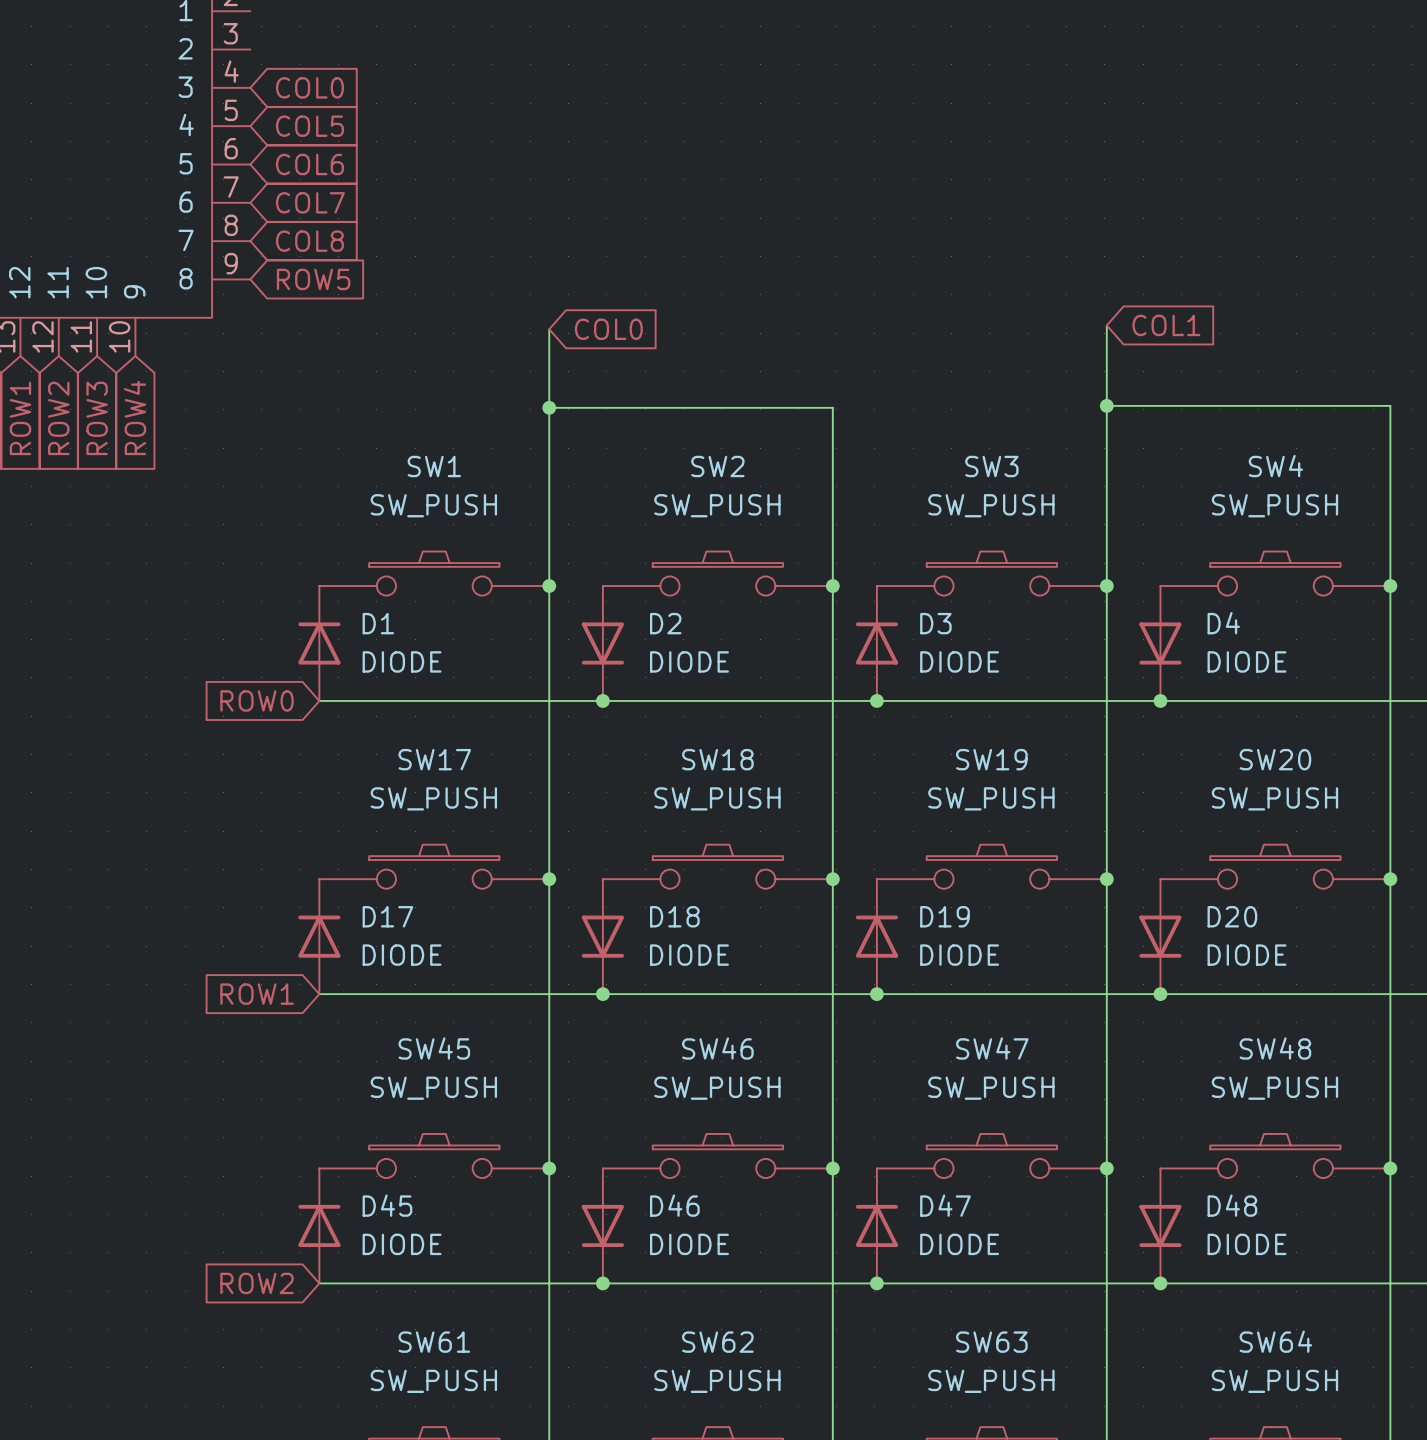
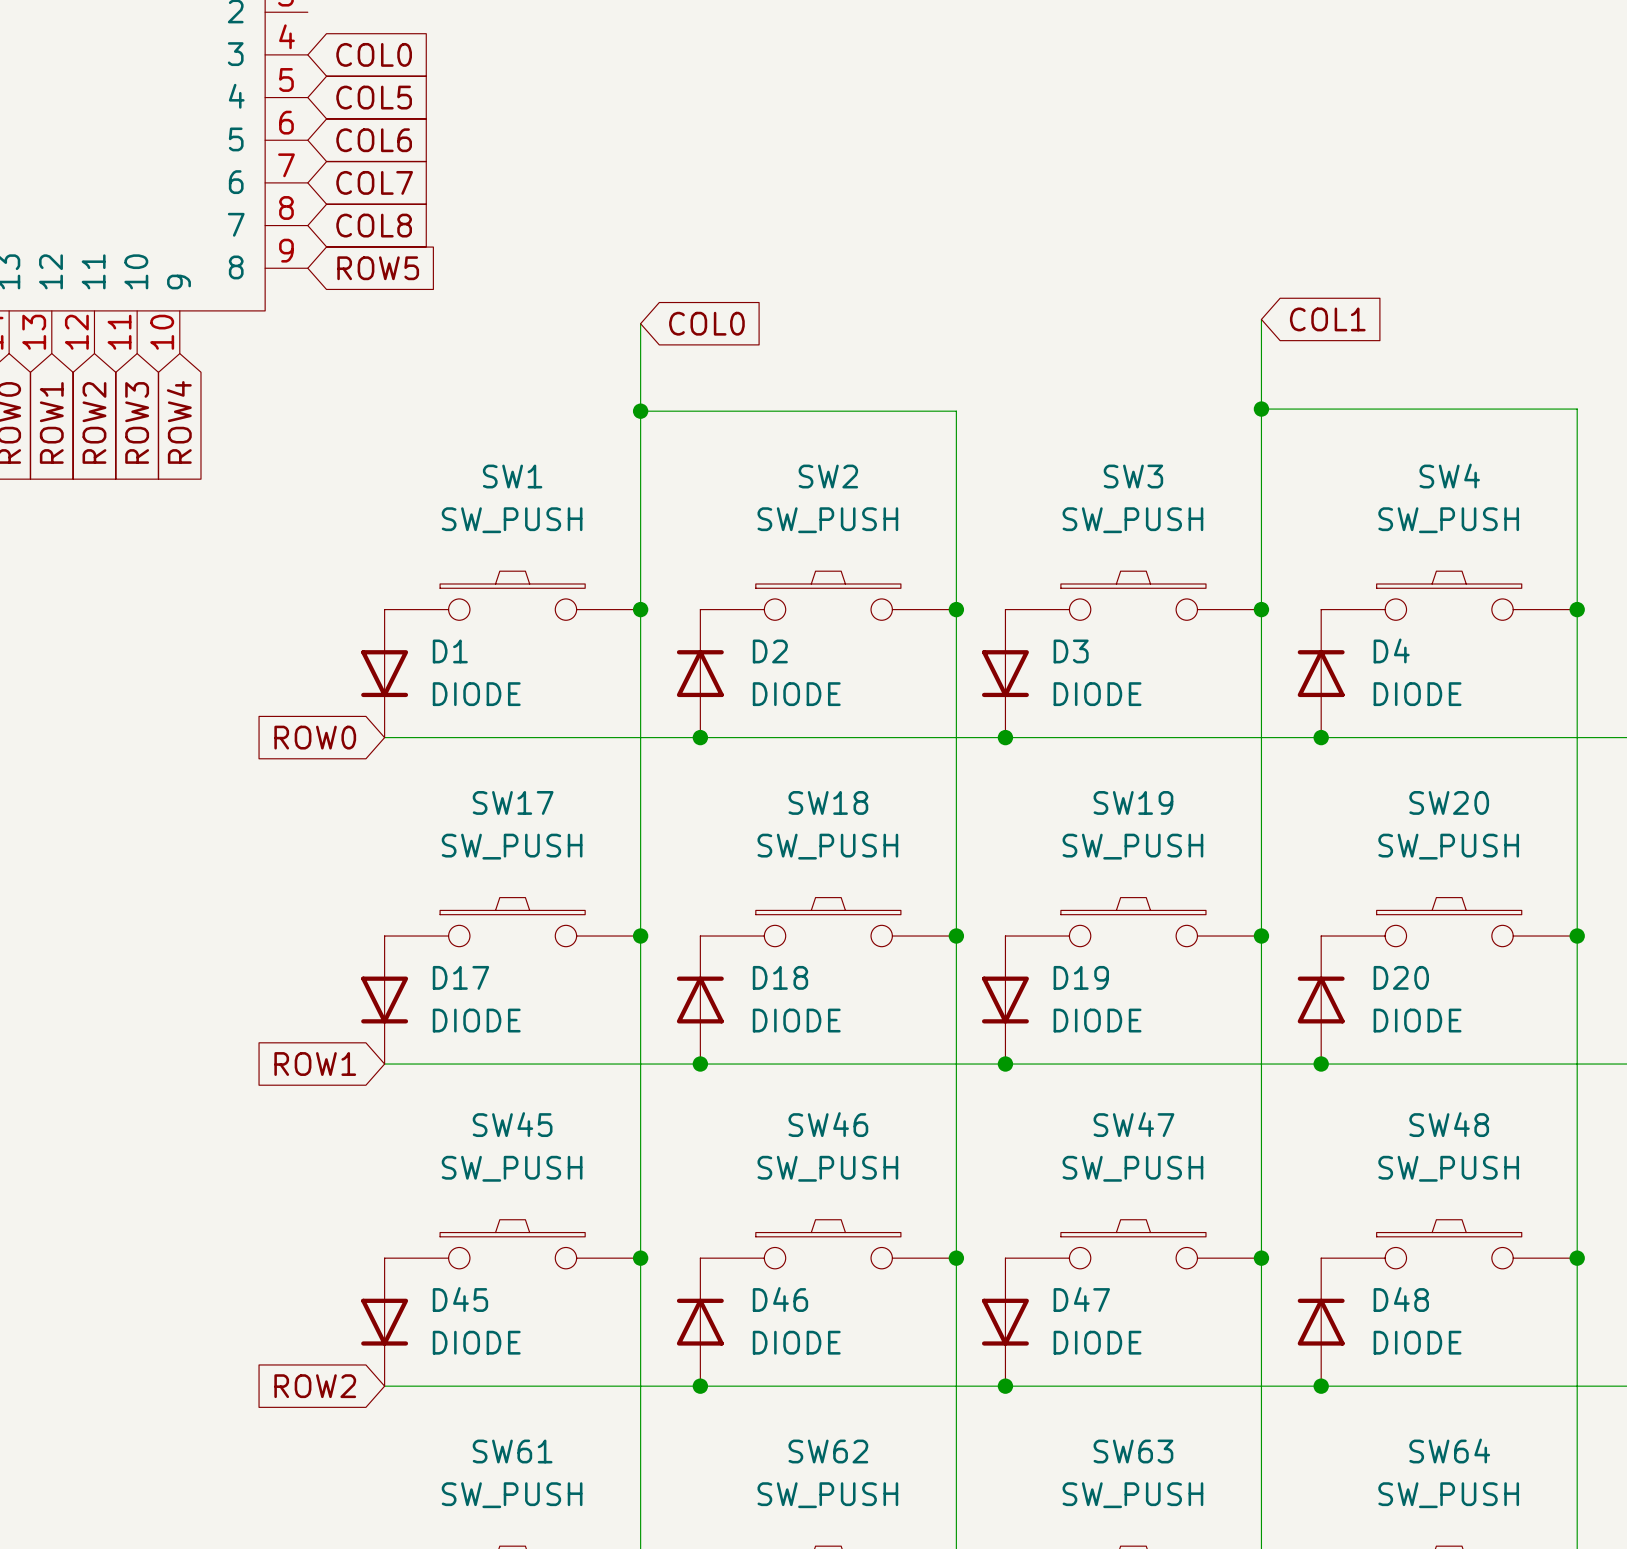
D1 rotation: 0° (319, 643) -> 180° (384, 673)
D2 rotation: 0° (602, 643) -> 180° (700, 673)
D3 rotation: 0° (876, 643) -> 180° (1005, 673)
D4 rotation: 0° (1160, 643) -> 180° (1321, 673)
D17 rotation: 0° (319, 936) -> 180° (384, 1000)
D18 rotation: 0° (602, 936) -> 180° (700, 1000)
D19 rotation: 0° (876, 936) -> 180° (1005, 1000)
D20 rotation: 0° (1160, 936) -> 180° (1321, 1000)
D45 rotation: 0° (319, 1225) -> 180° (384, 1322)
D46 rotation: 0° (602, 1225) -> 180° (700, 1322)
D47 rotation: 0° (876, 1225) -> 180° (1005, 1322)
D48 rotation: 0° (1160, 1225) -> 180° (1321, 1322)

